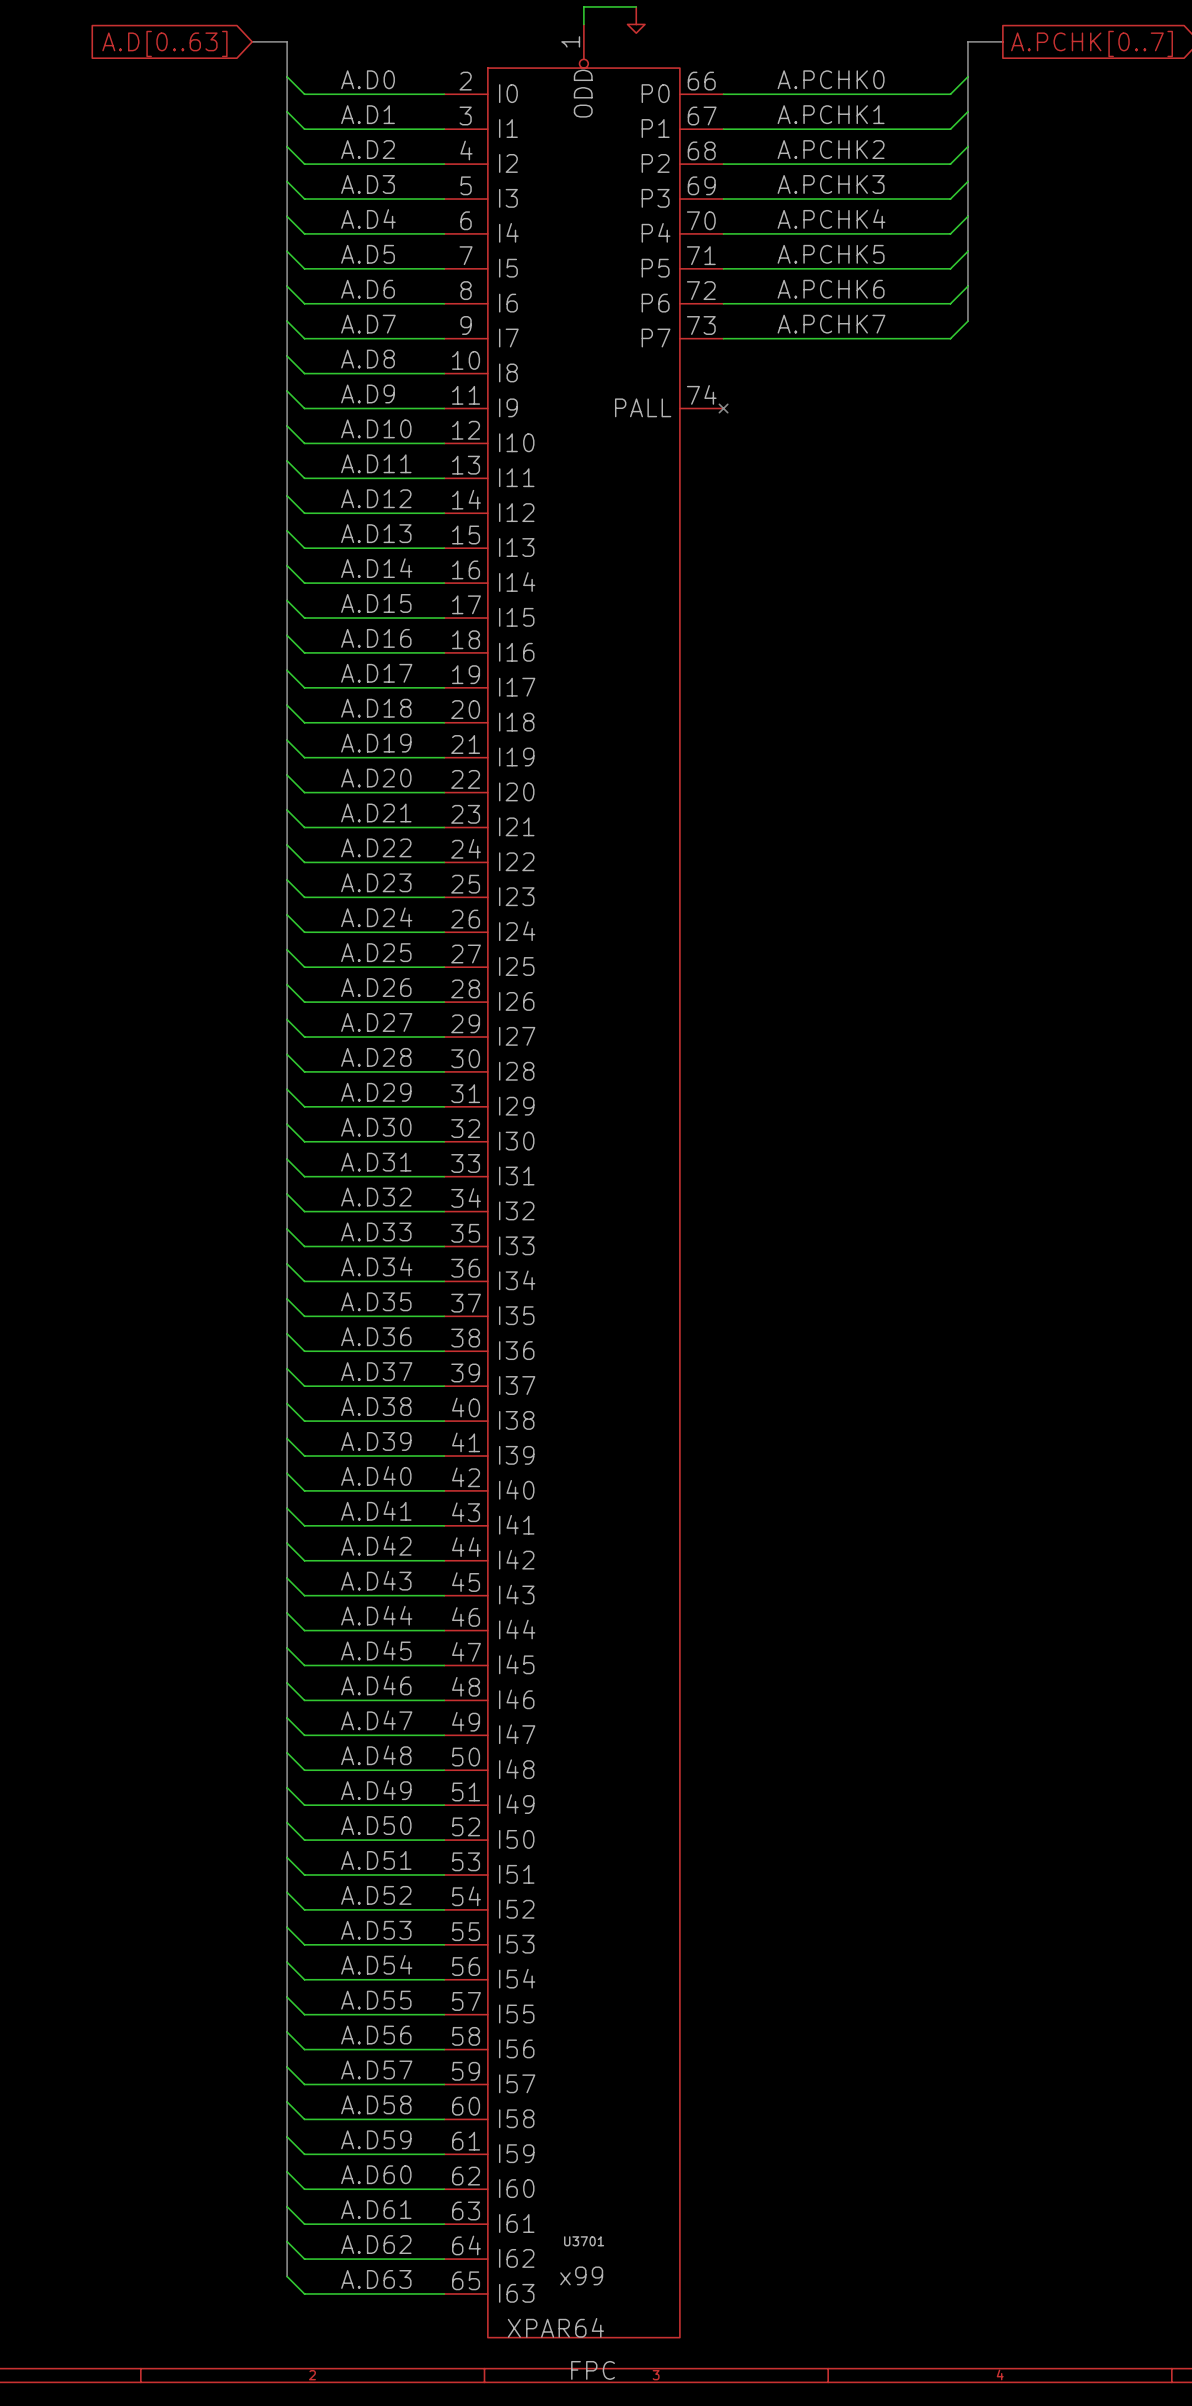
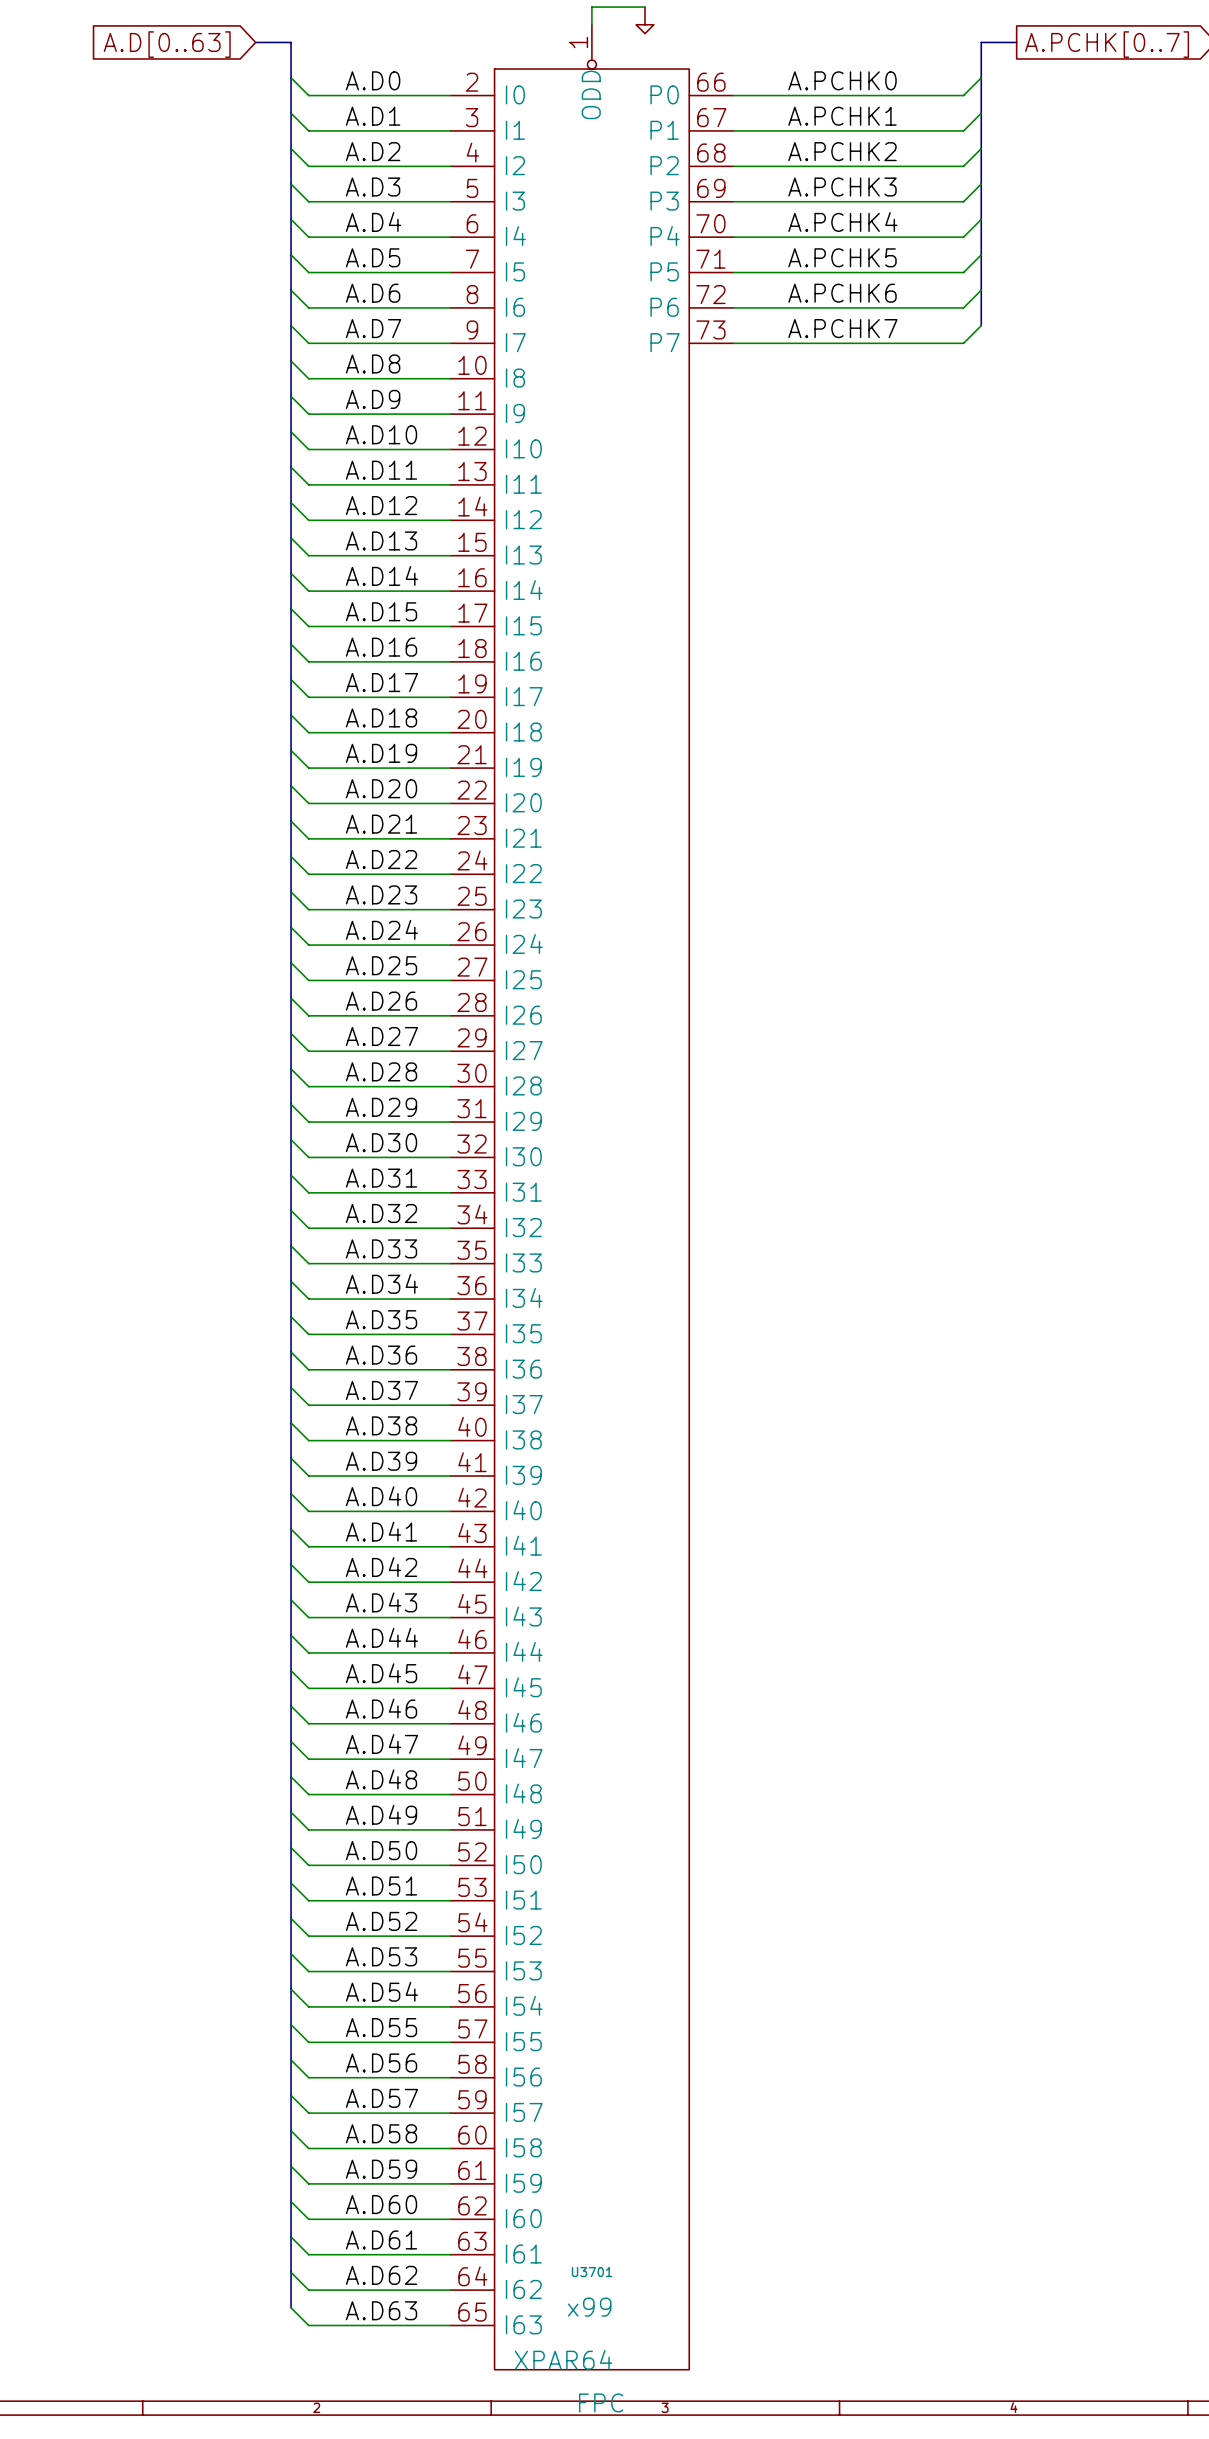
U3701 symbol: [444, 24, 724, 2338] -> [450, 24, 734, 2370]
no-connect mark: (723, 408) -> none

